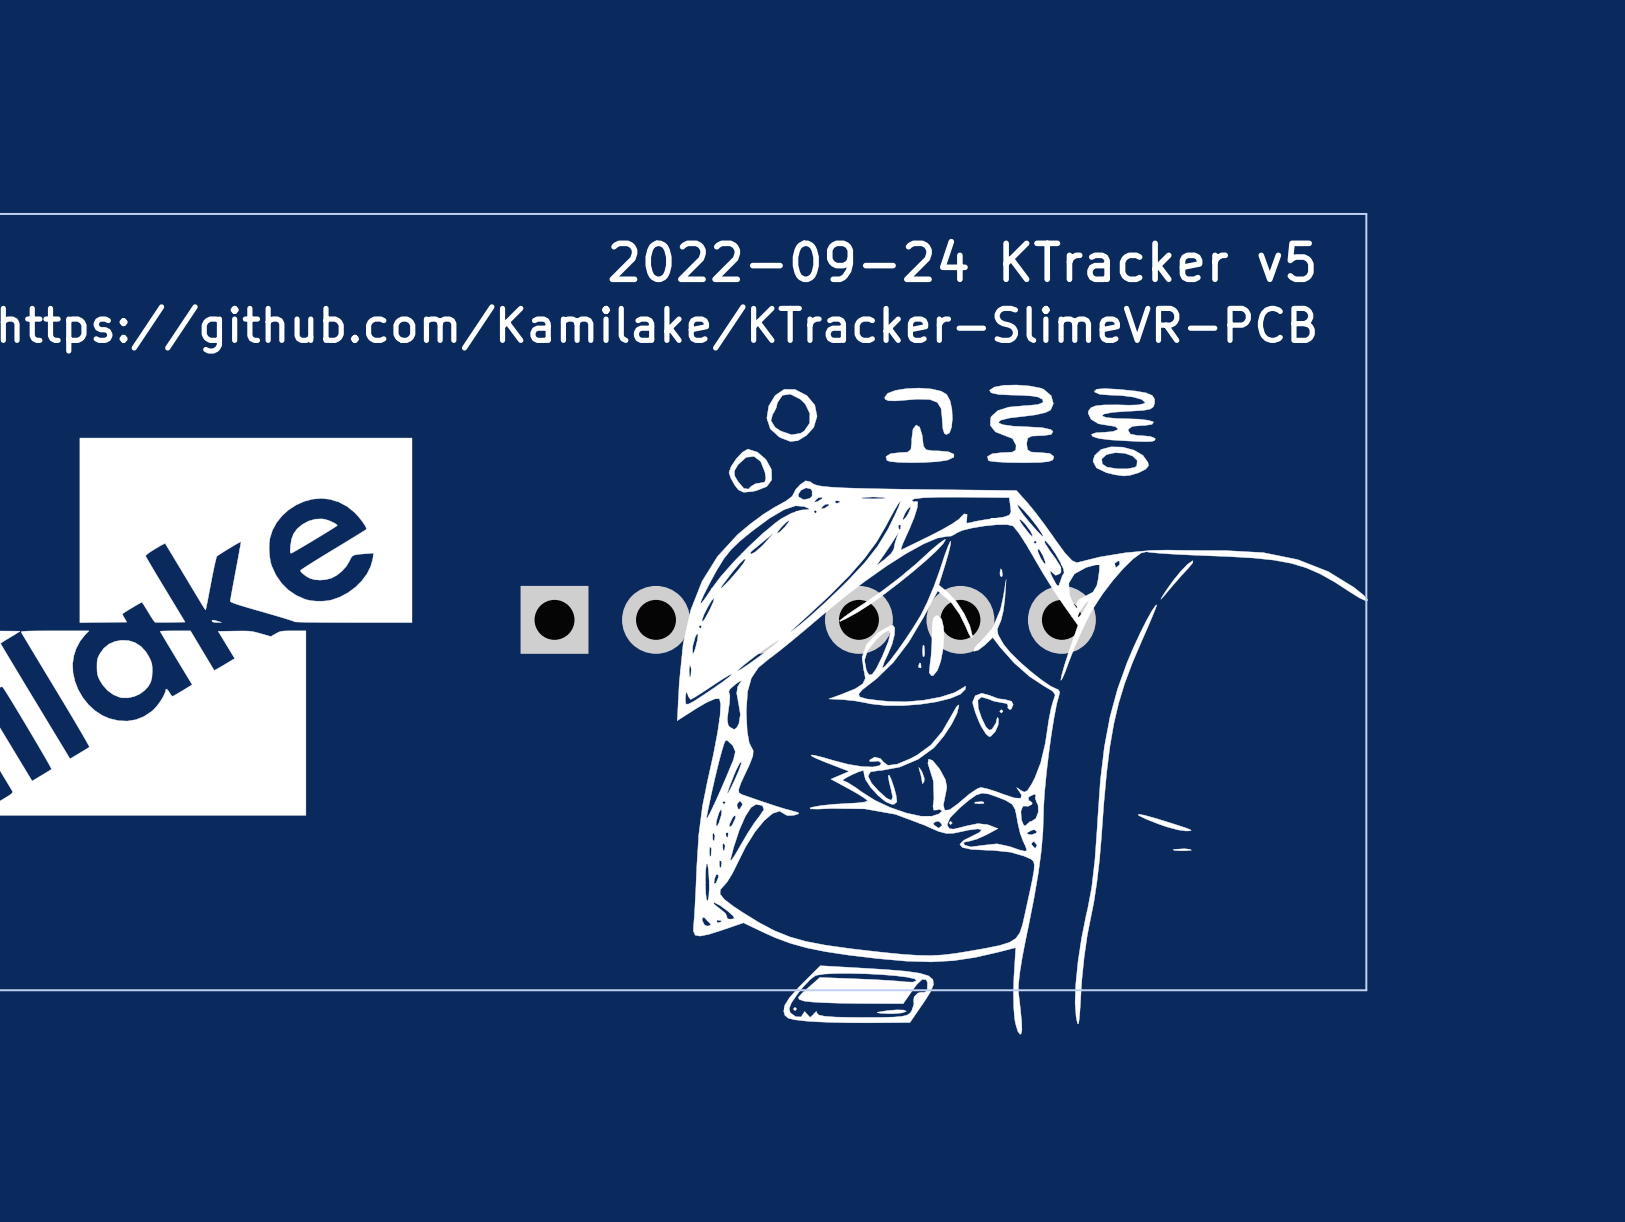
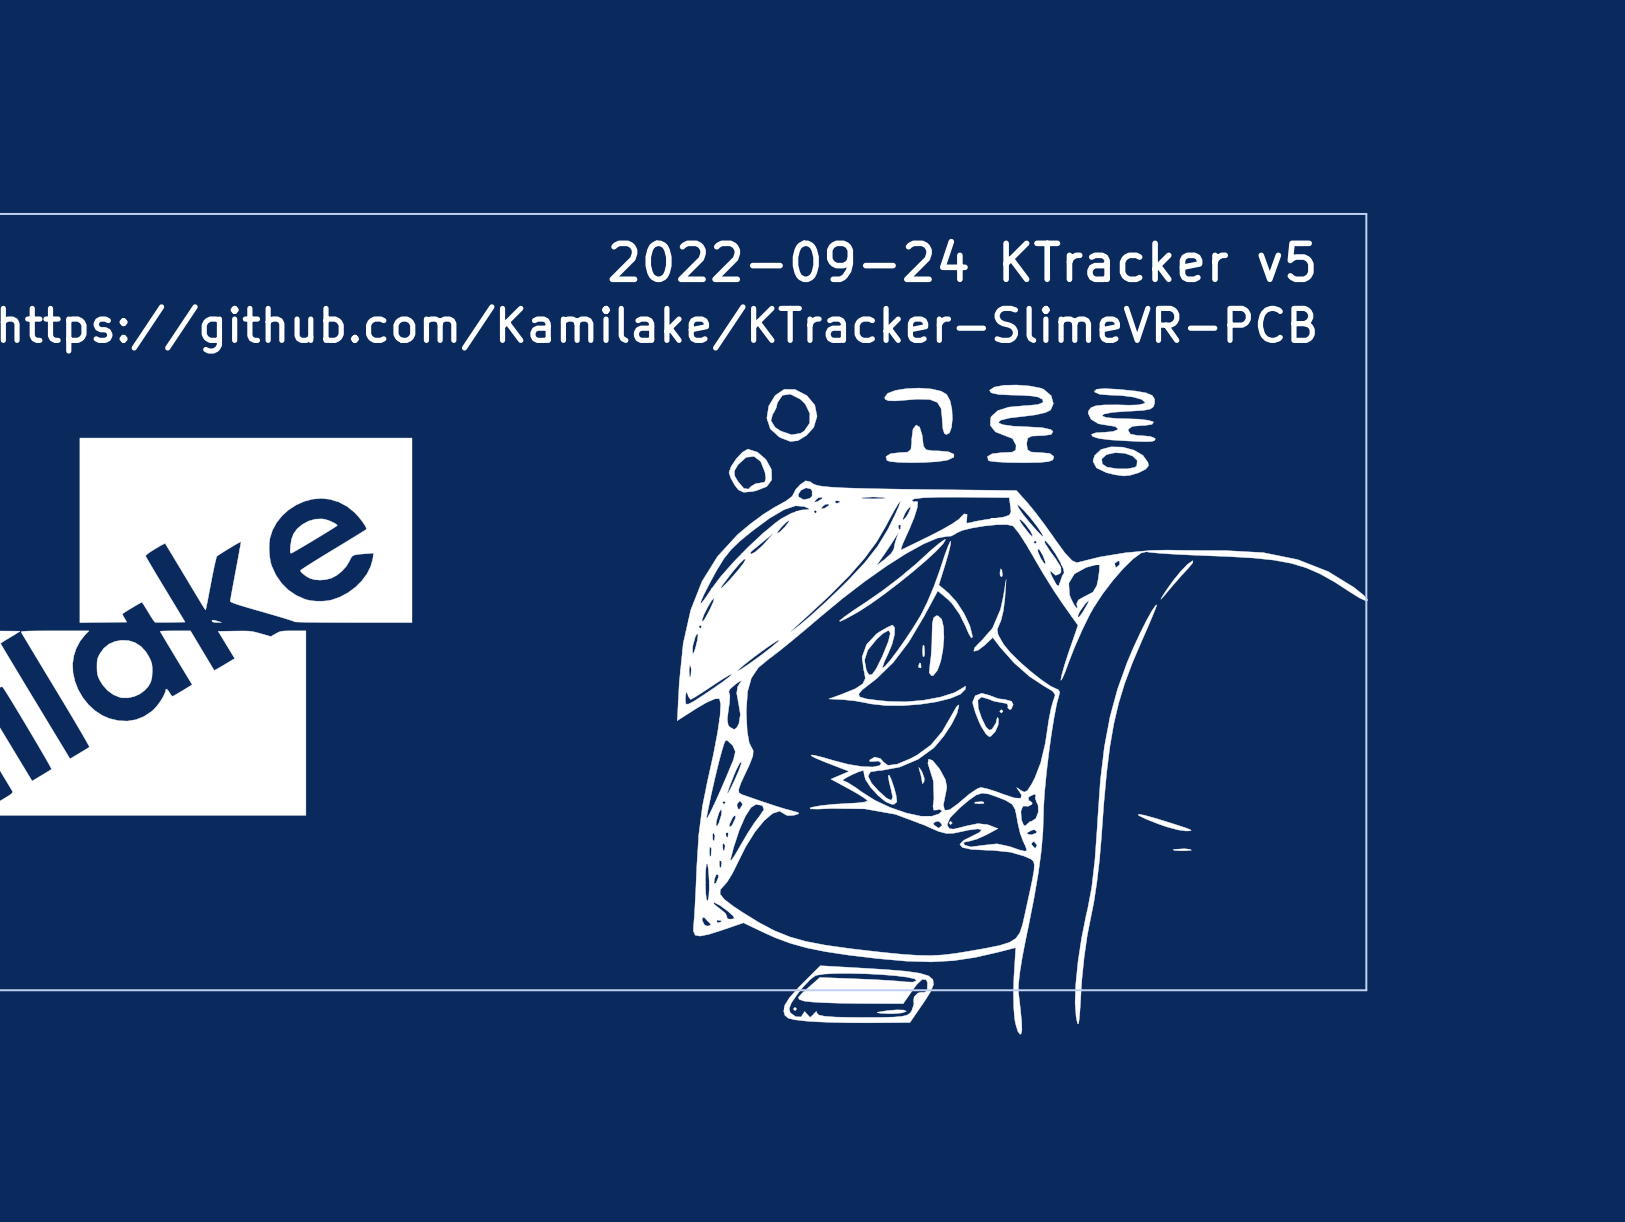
part: (808, 619) -> none

